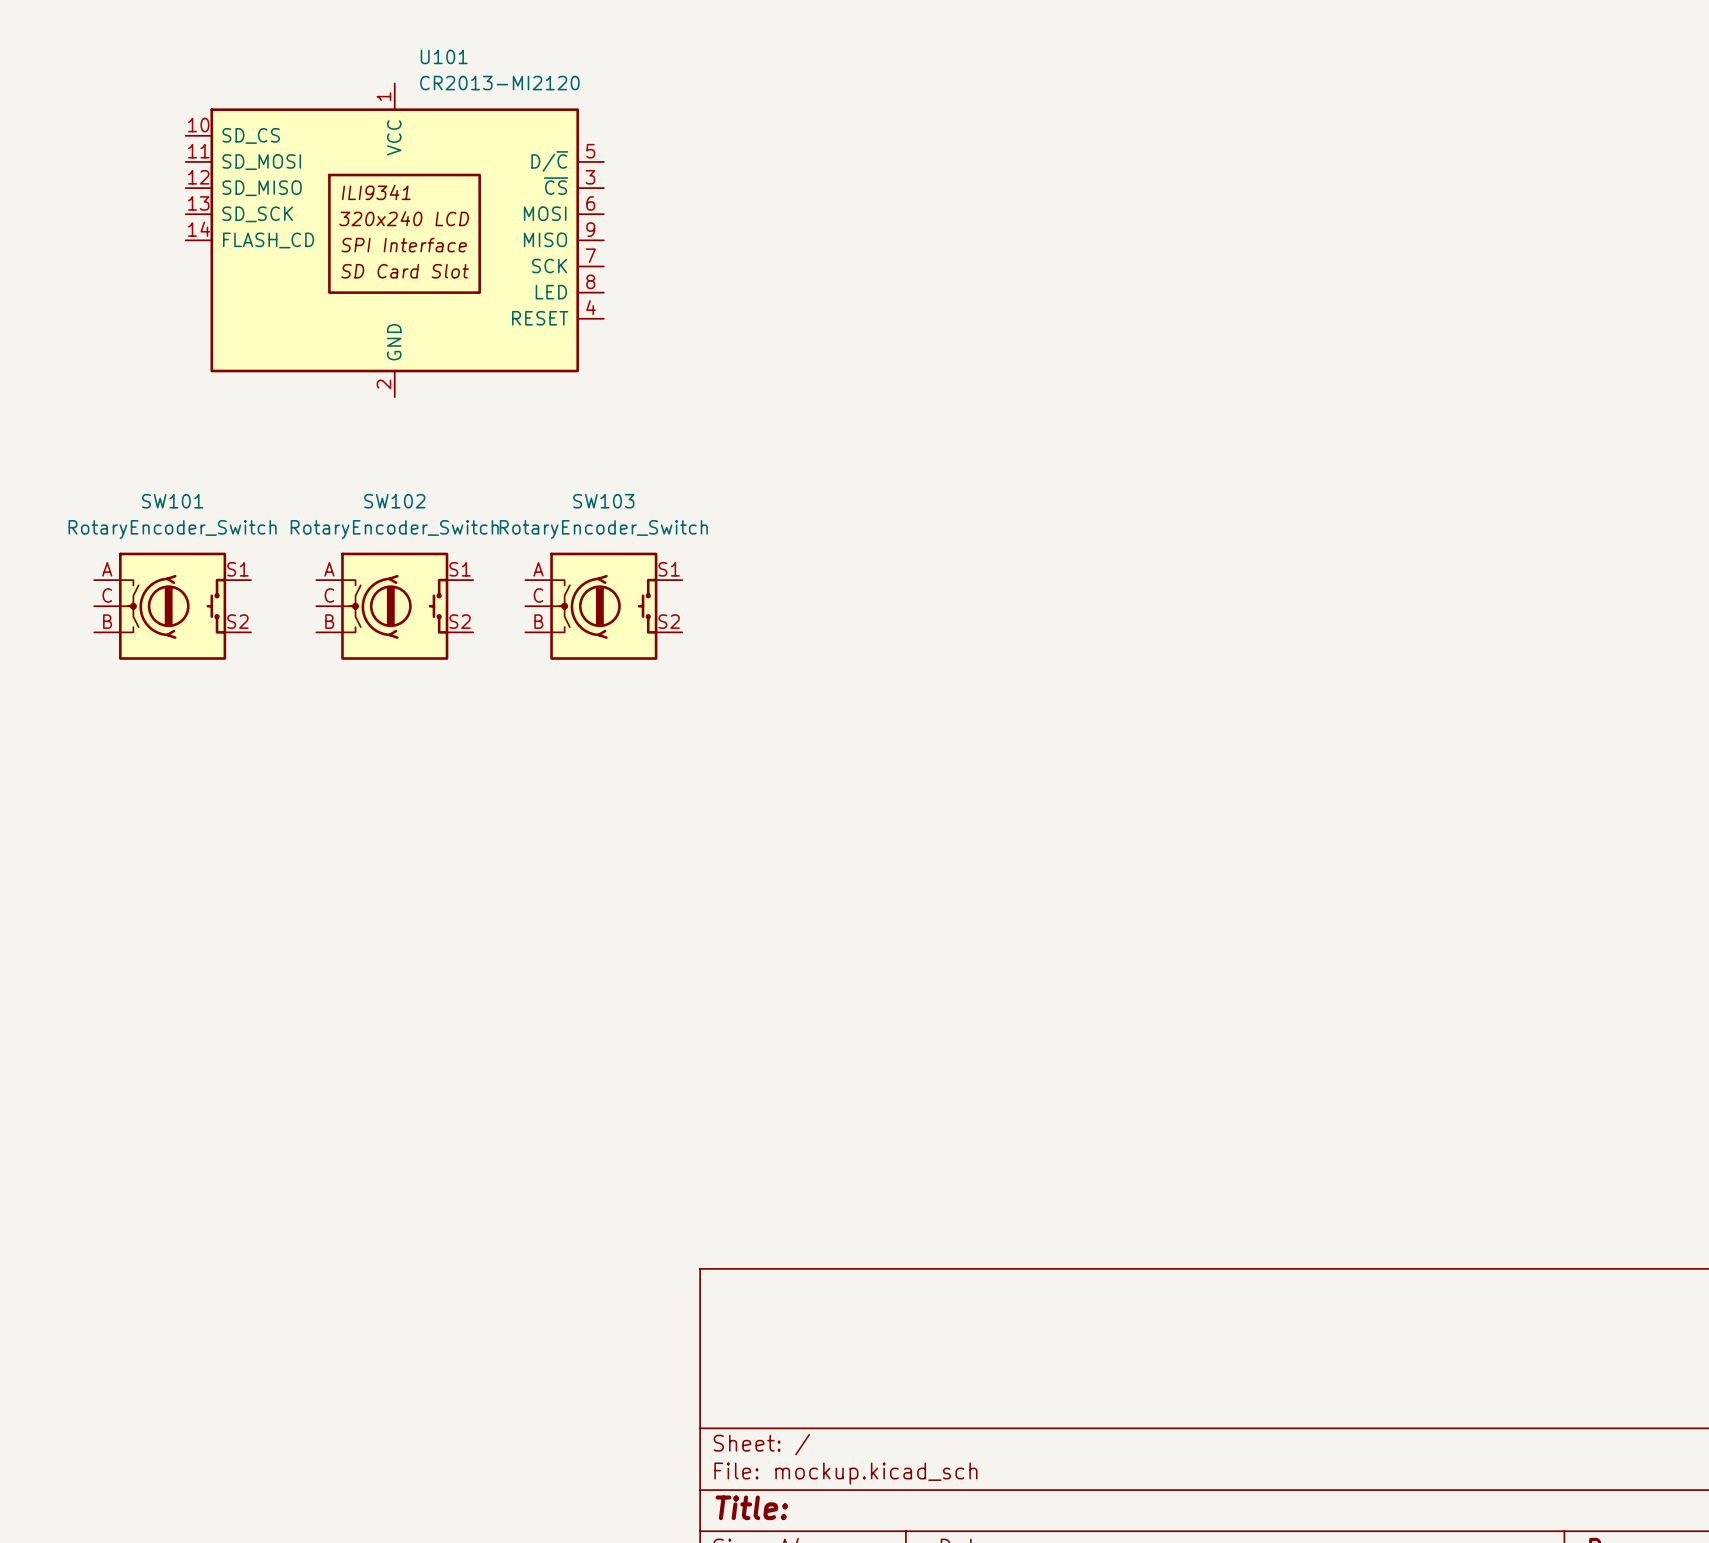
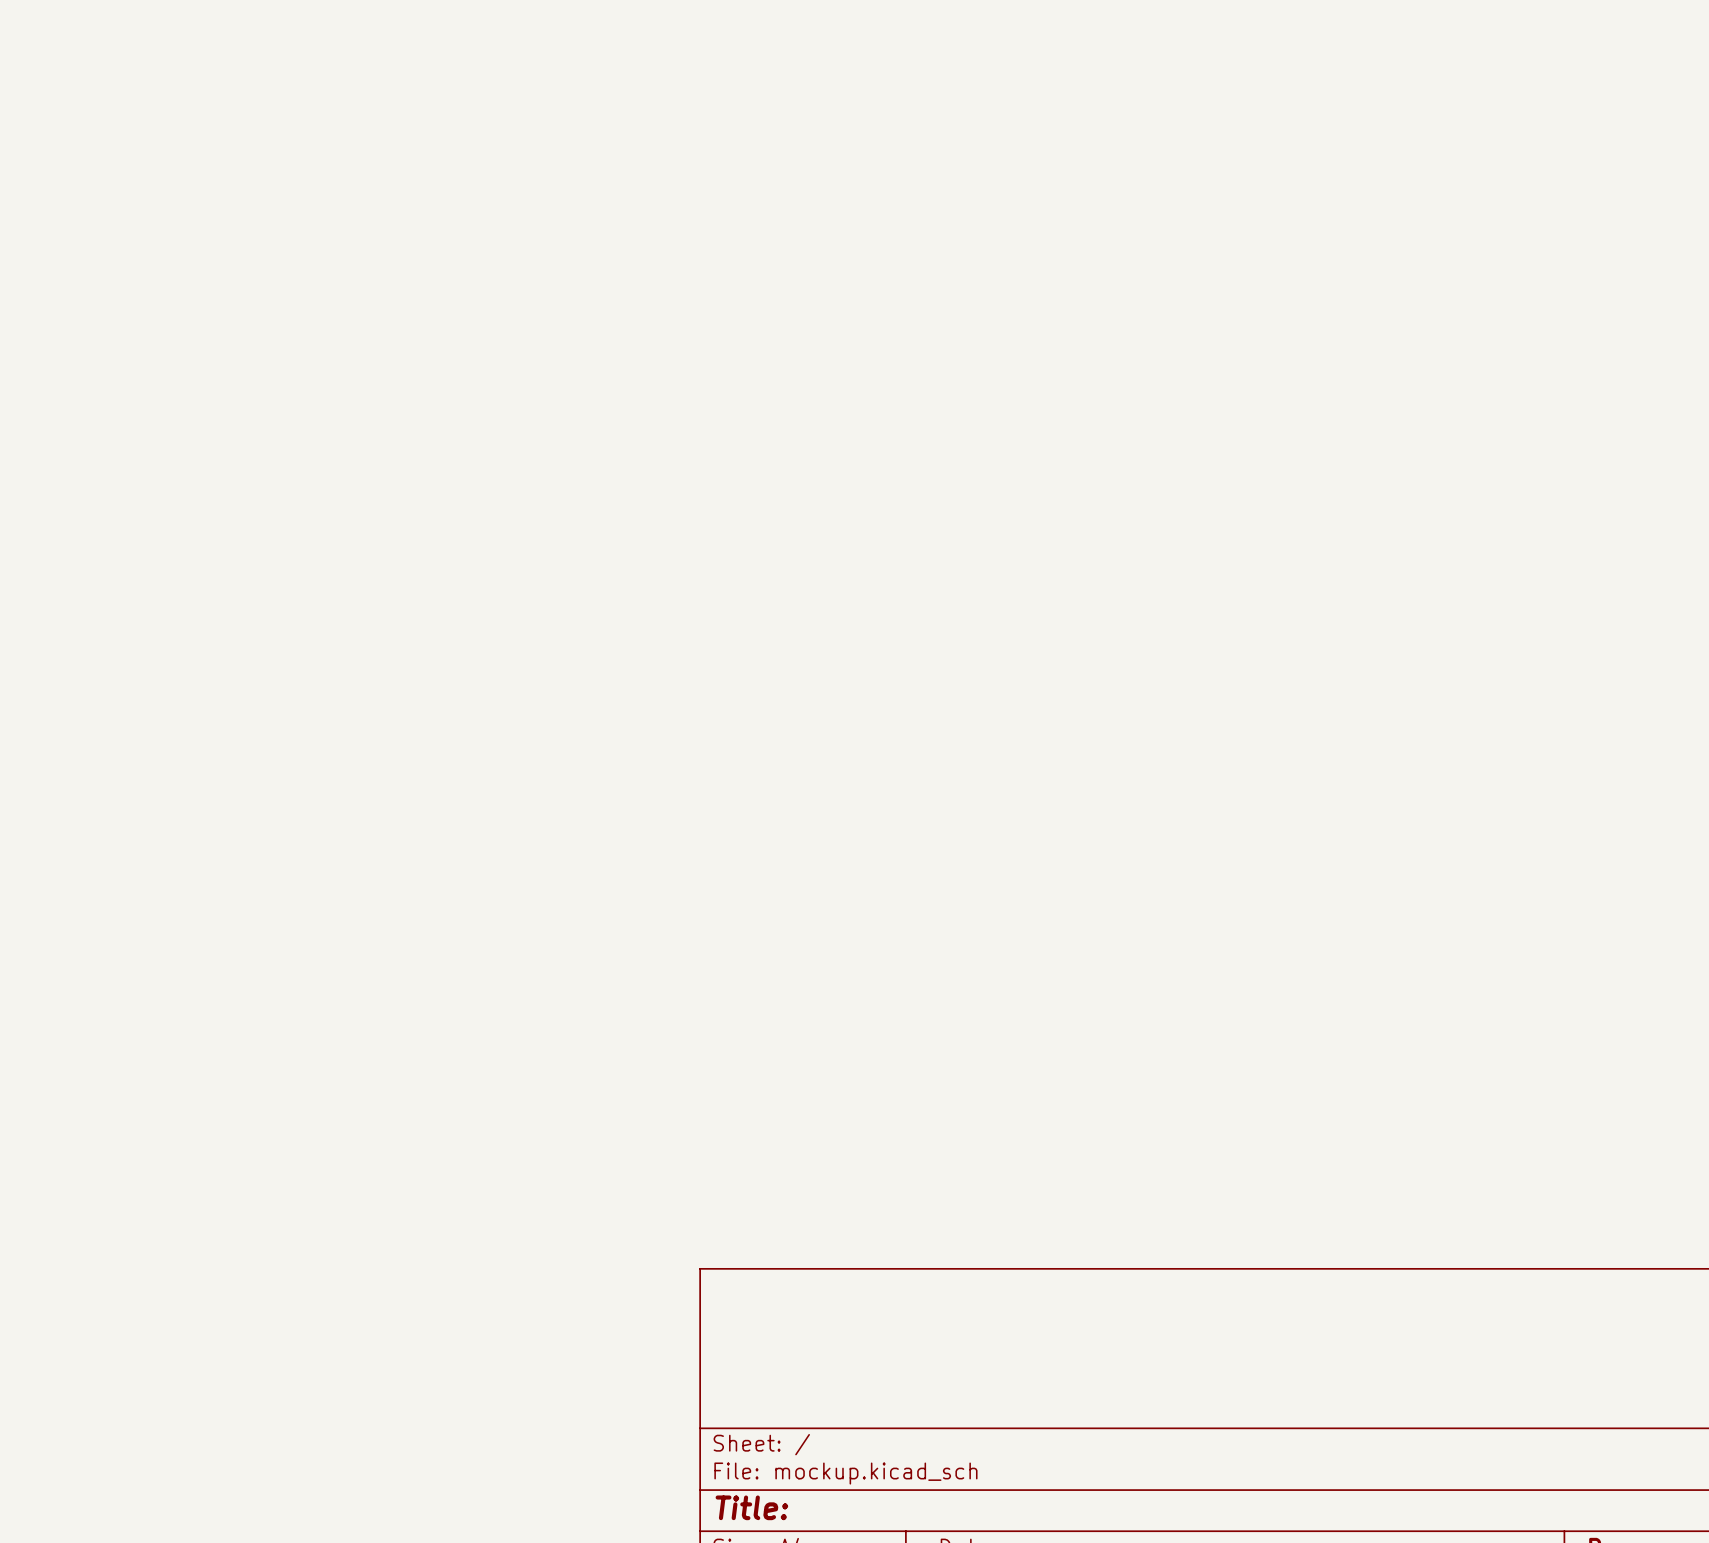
U101: CR2013-MI2120 (394, 240) -> none
SW101: RotaryEncoder_Switch (172, 606) -> none
SW102: RotaryEncoder_Switch (394, 606) -> none
SW103: RotaryEncoder_Switch (603, 606) -> none

